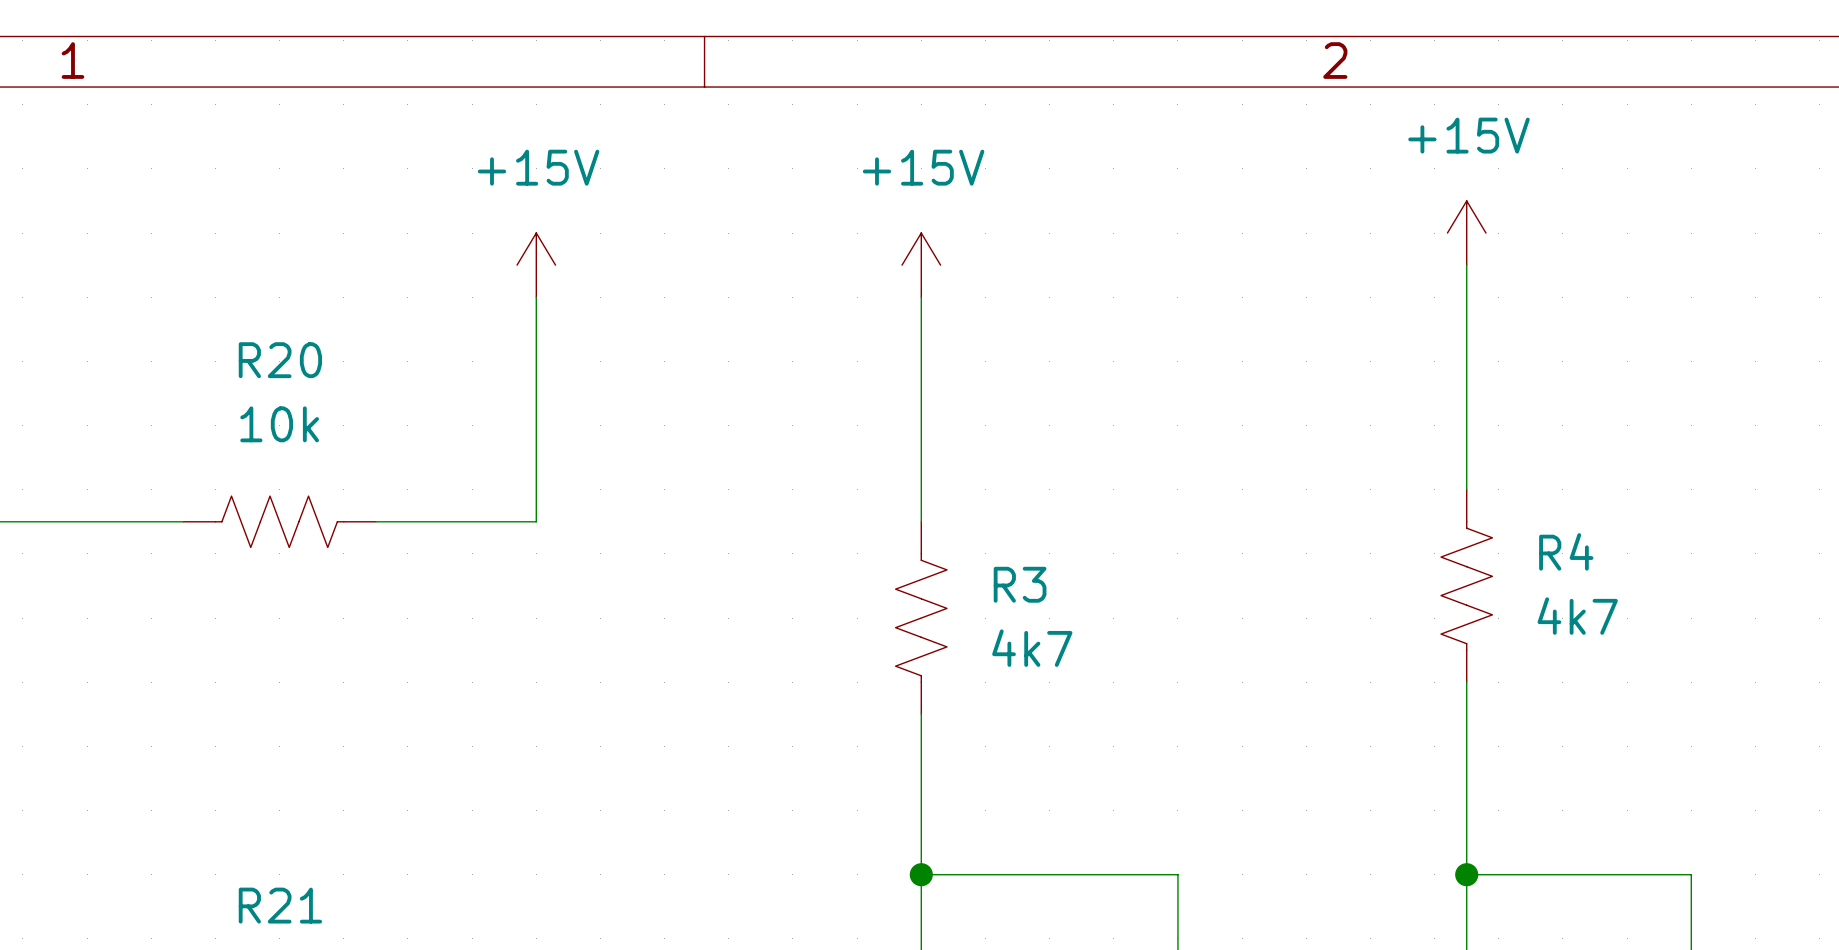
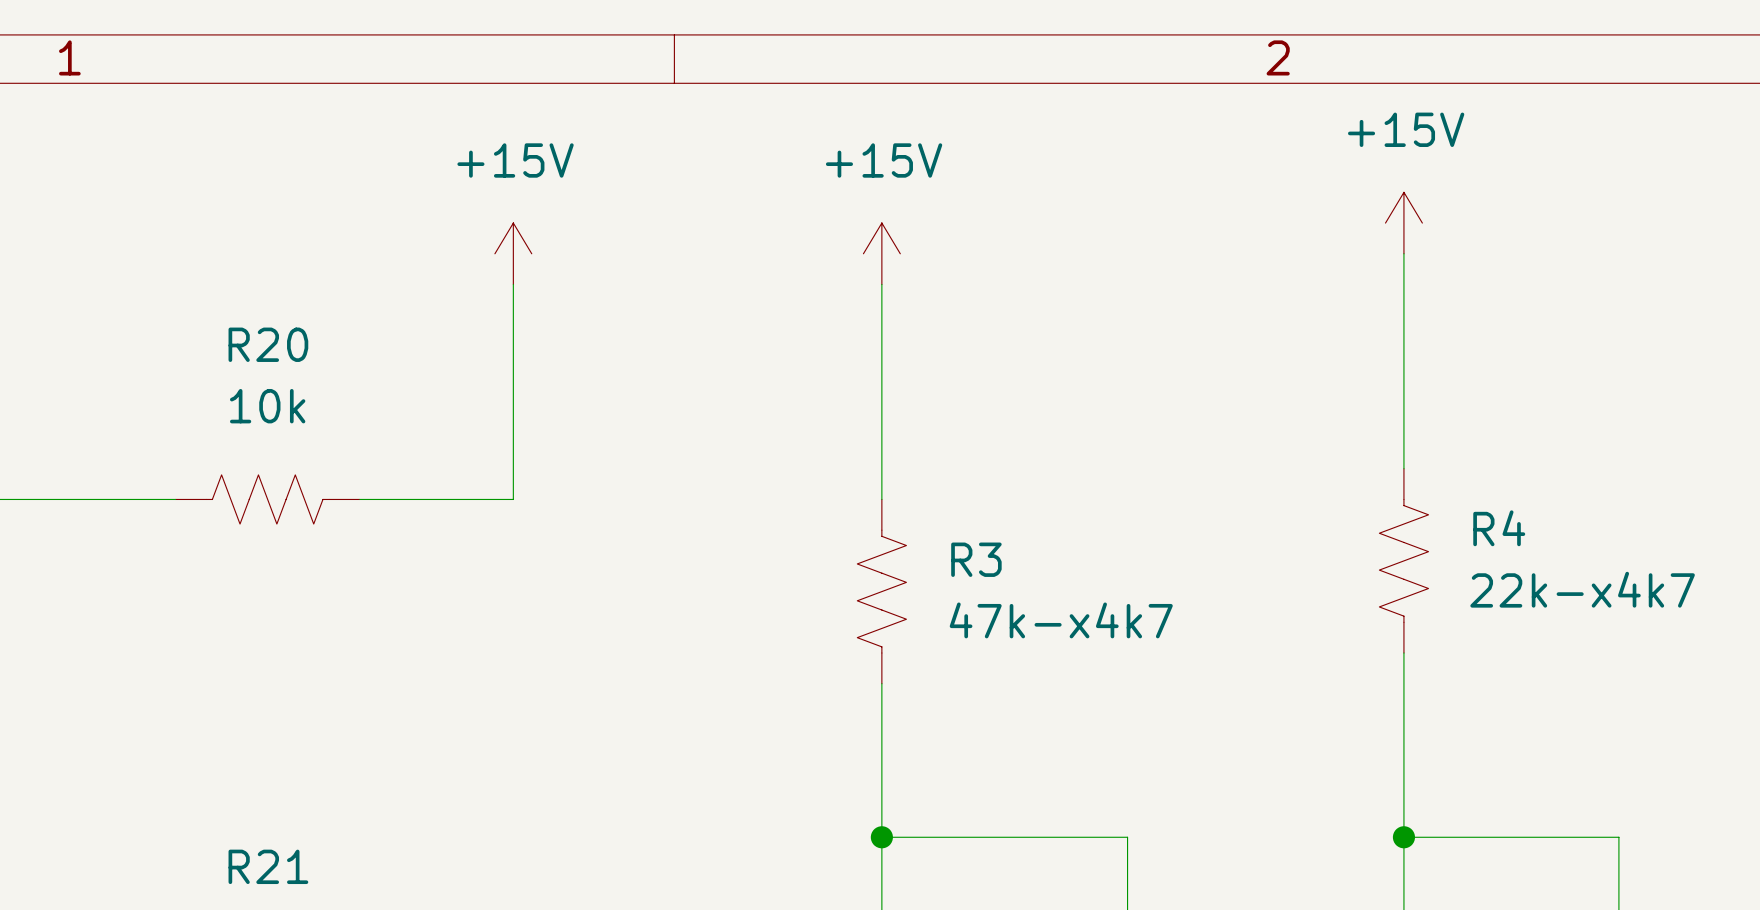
R4 value: 4k7 (1577, 616) -> 22k-x4k7 (1582, 589)
R3 value: 4k7 (1032, 648) -> 47k-x4k7 (1061, 620)

